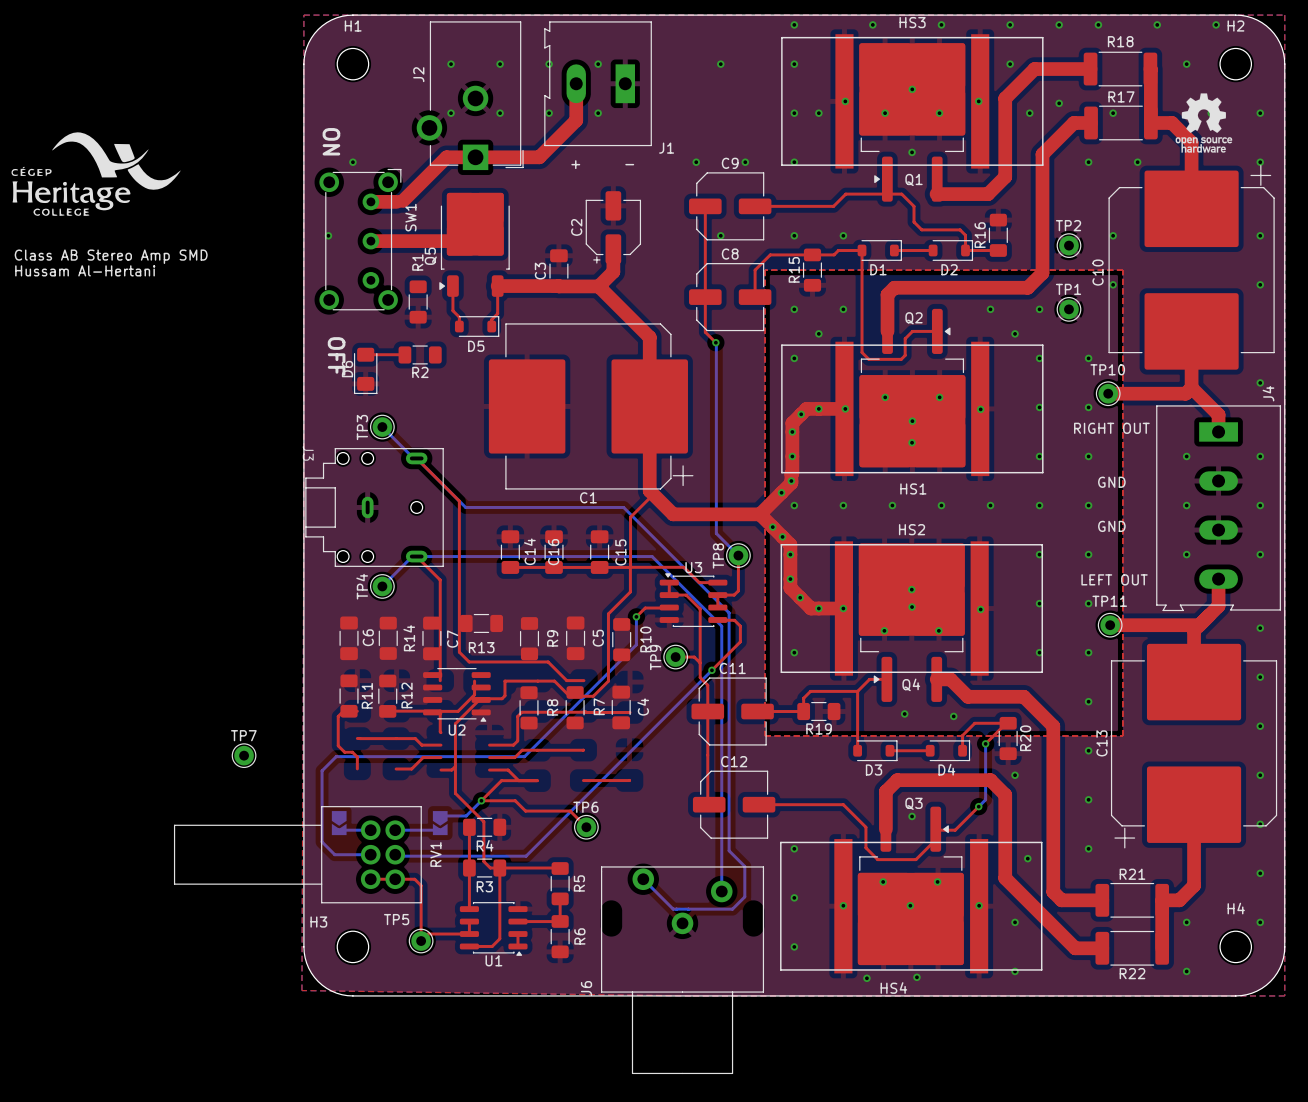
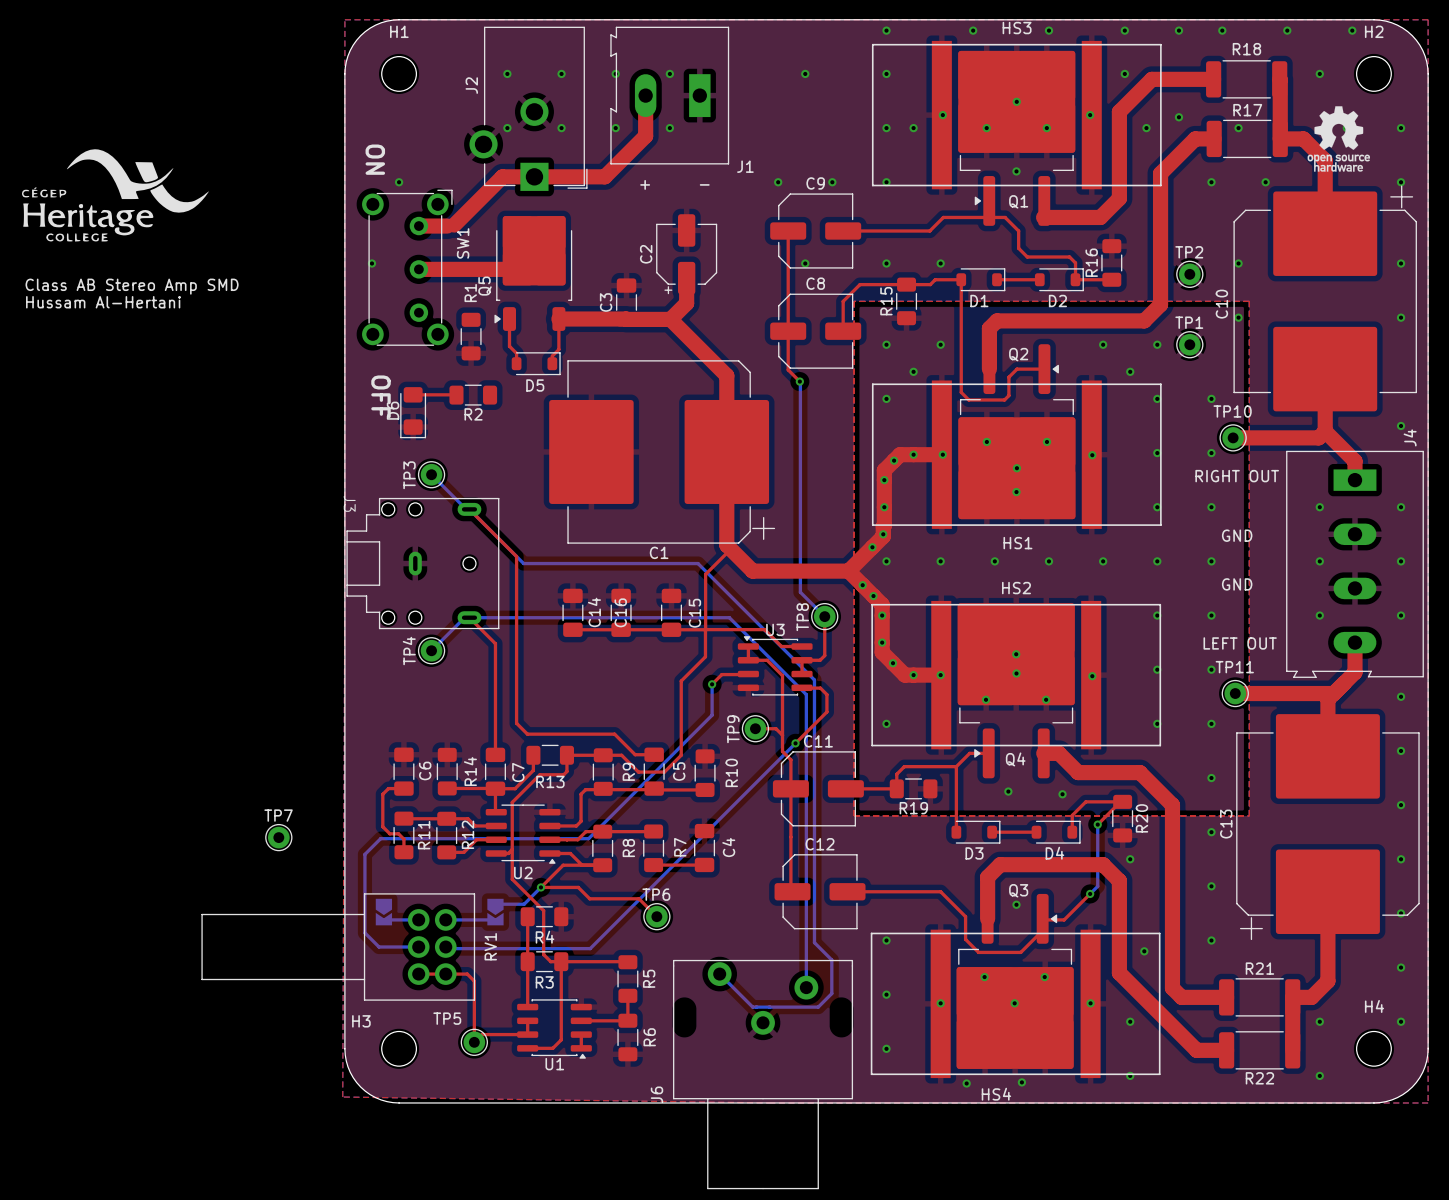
R13 position: (481, 623) -> (550, 755)
C6 position: (349, 638) -> (403, 771)
R14 position: (388, 638) -> (447, 771)
C7 position: (431, 638) -> (495, 771)
R9 position: (529, 638) -> (603, 772)
C5 position: (575, 638) -> (654, 771)
R10 position: (621, 639) -> (705, 773)
U2 position: (456, 694) -> (523, 834)
R11 position: (349, 696) -> (403, 835)
R12 position: (387, 696) -> (446, 835)
R8 position: (529, 707) -> (602, 848)
R7 position: (575, 707) -> (653, 848)
C4 position: (621, 707) -> (704, 848)

